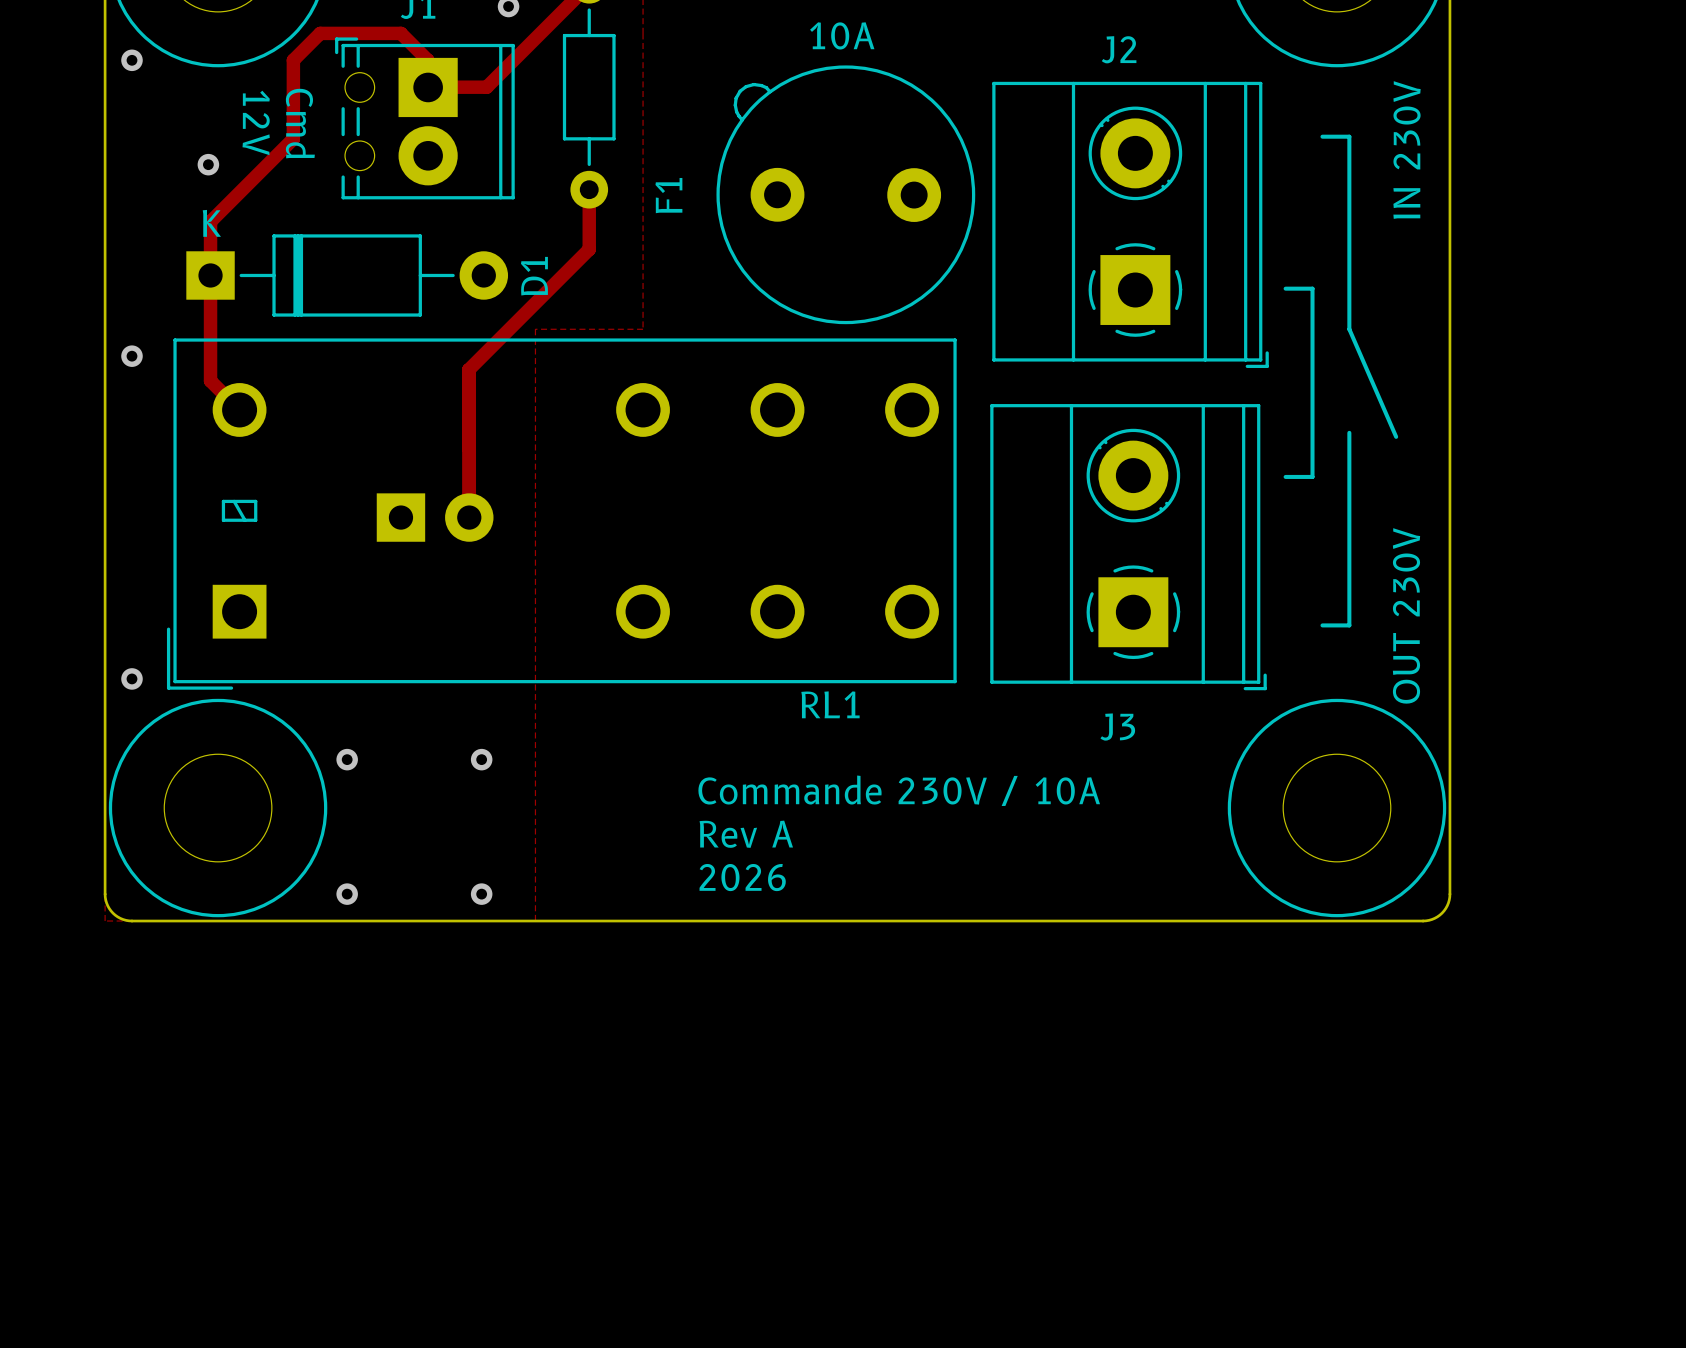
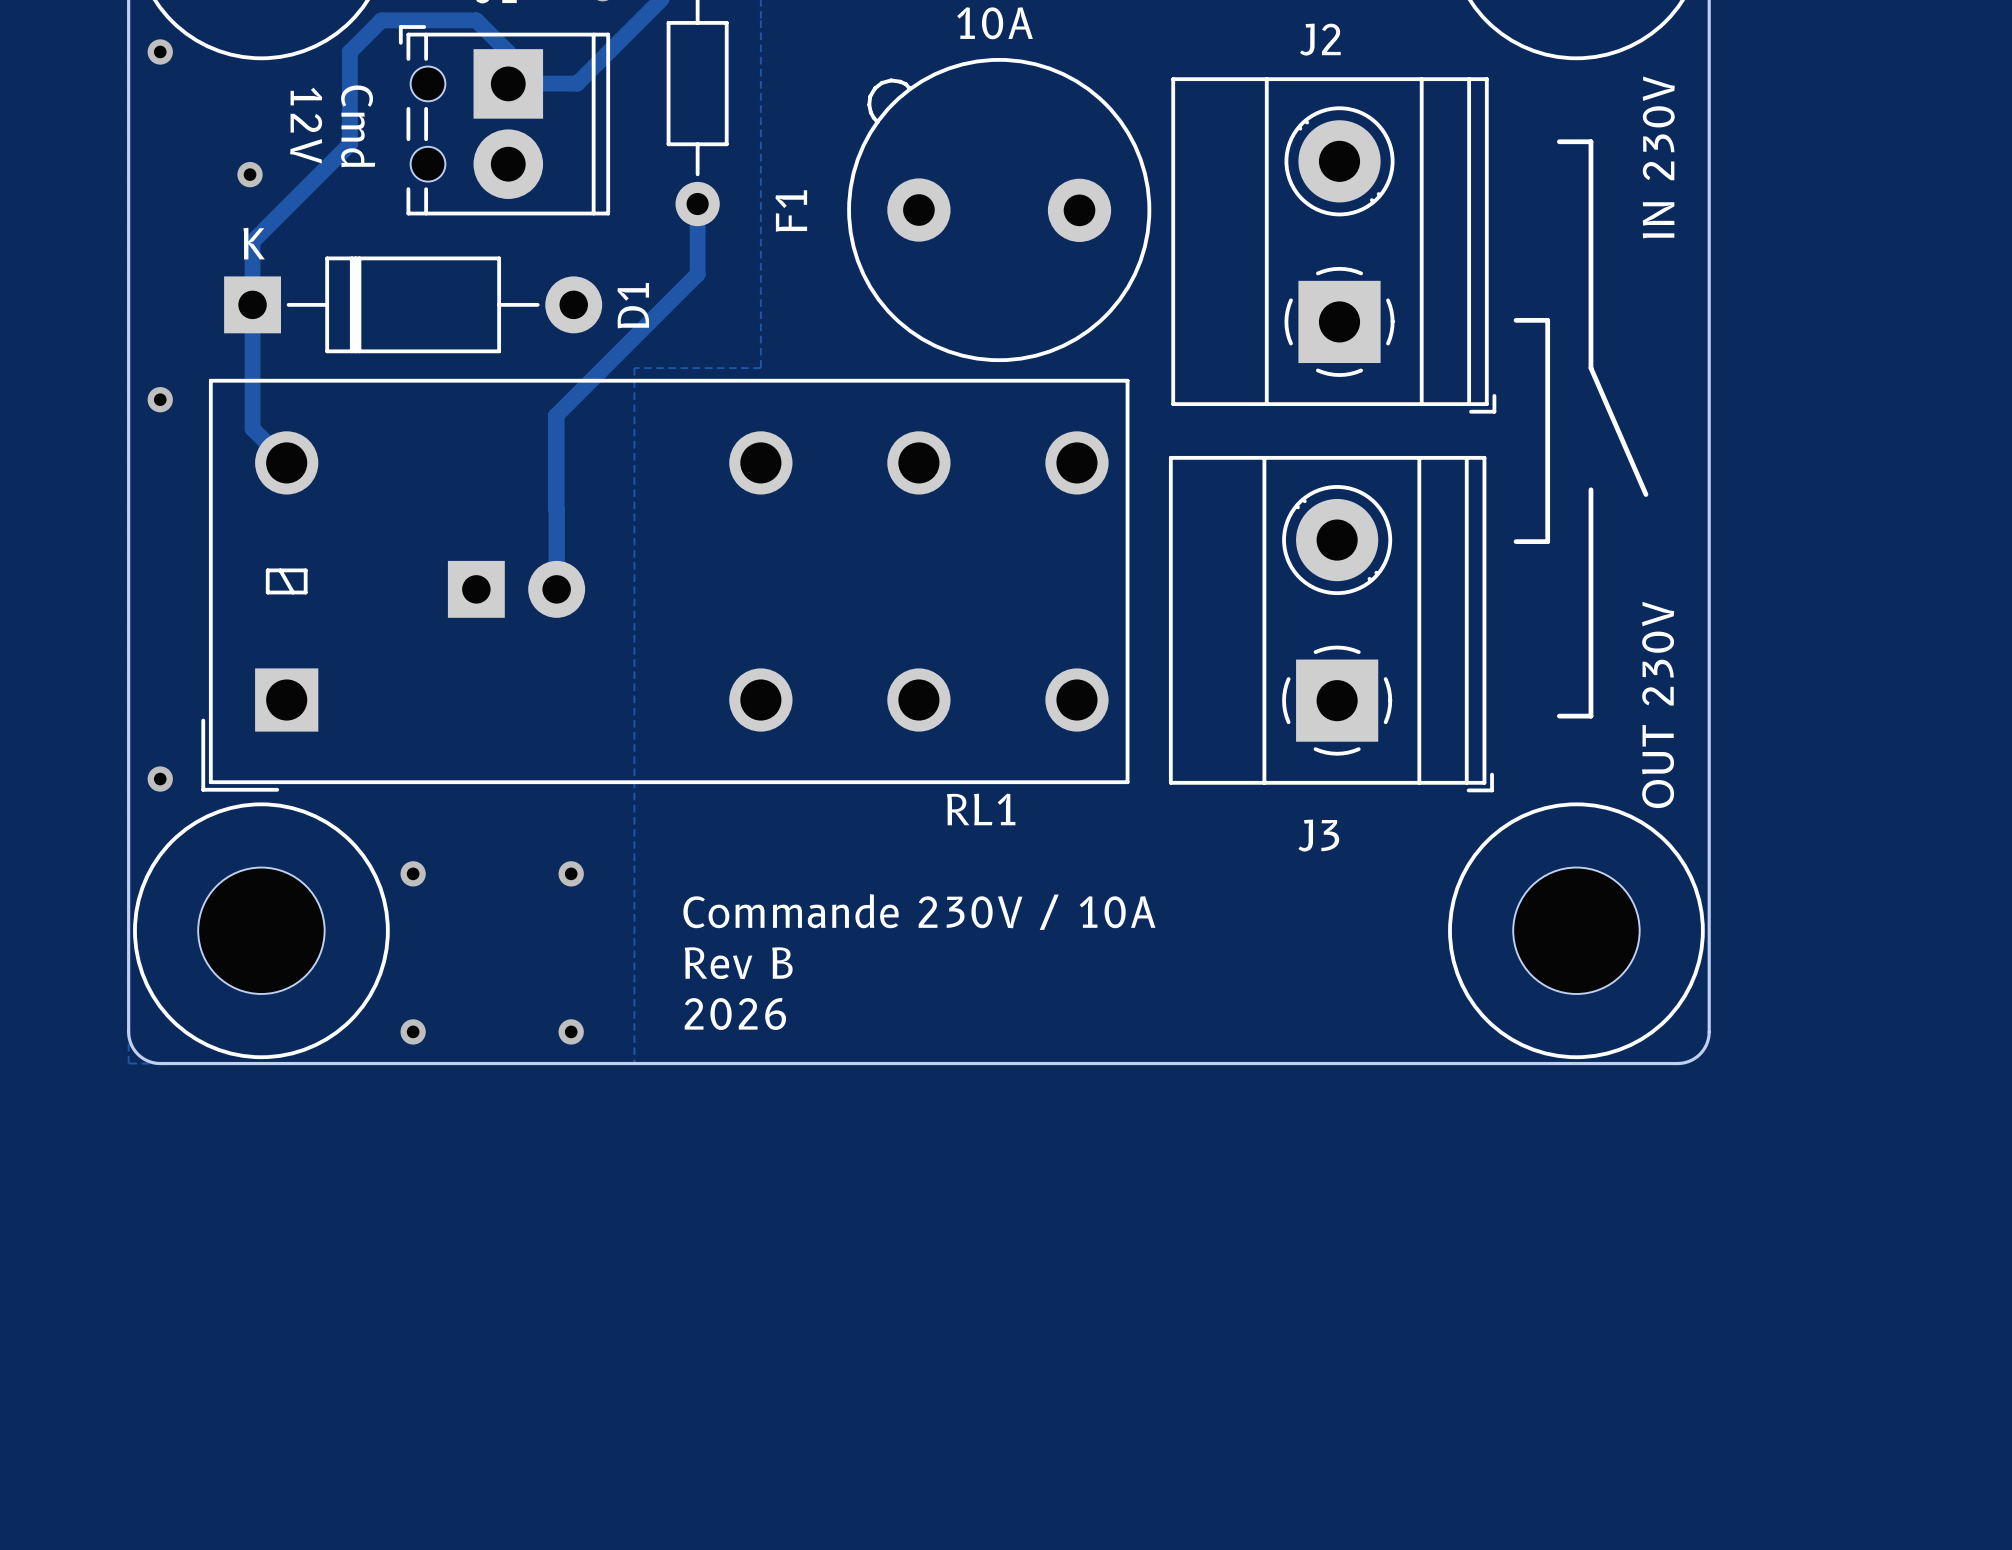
text position: Commande 230V / 10A (899, 790) -> Commande 230V / 10A (919, 912)
text: Rev A (746, 834) -> Rev B (738, 963)
text position: 2026 (742, 877) -> 2026 (735, 1014)

